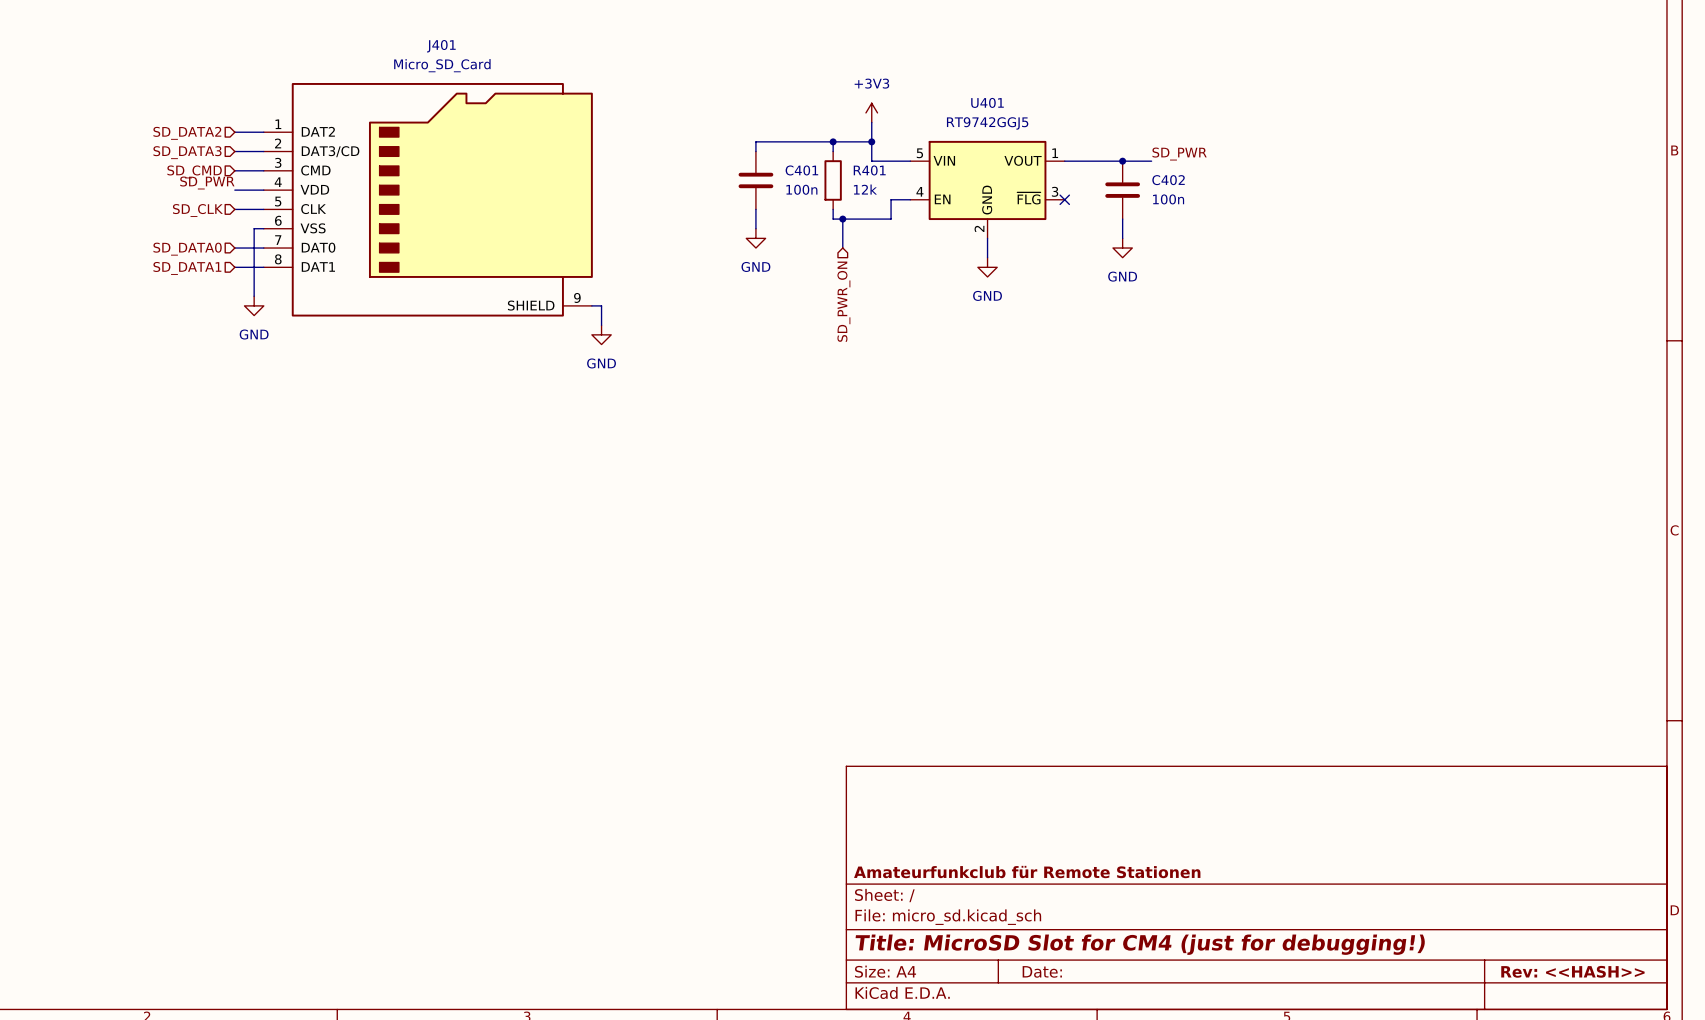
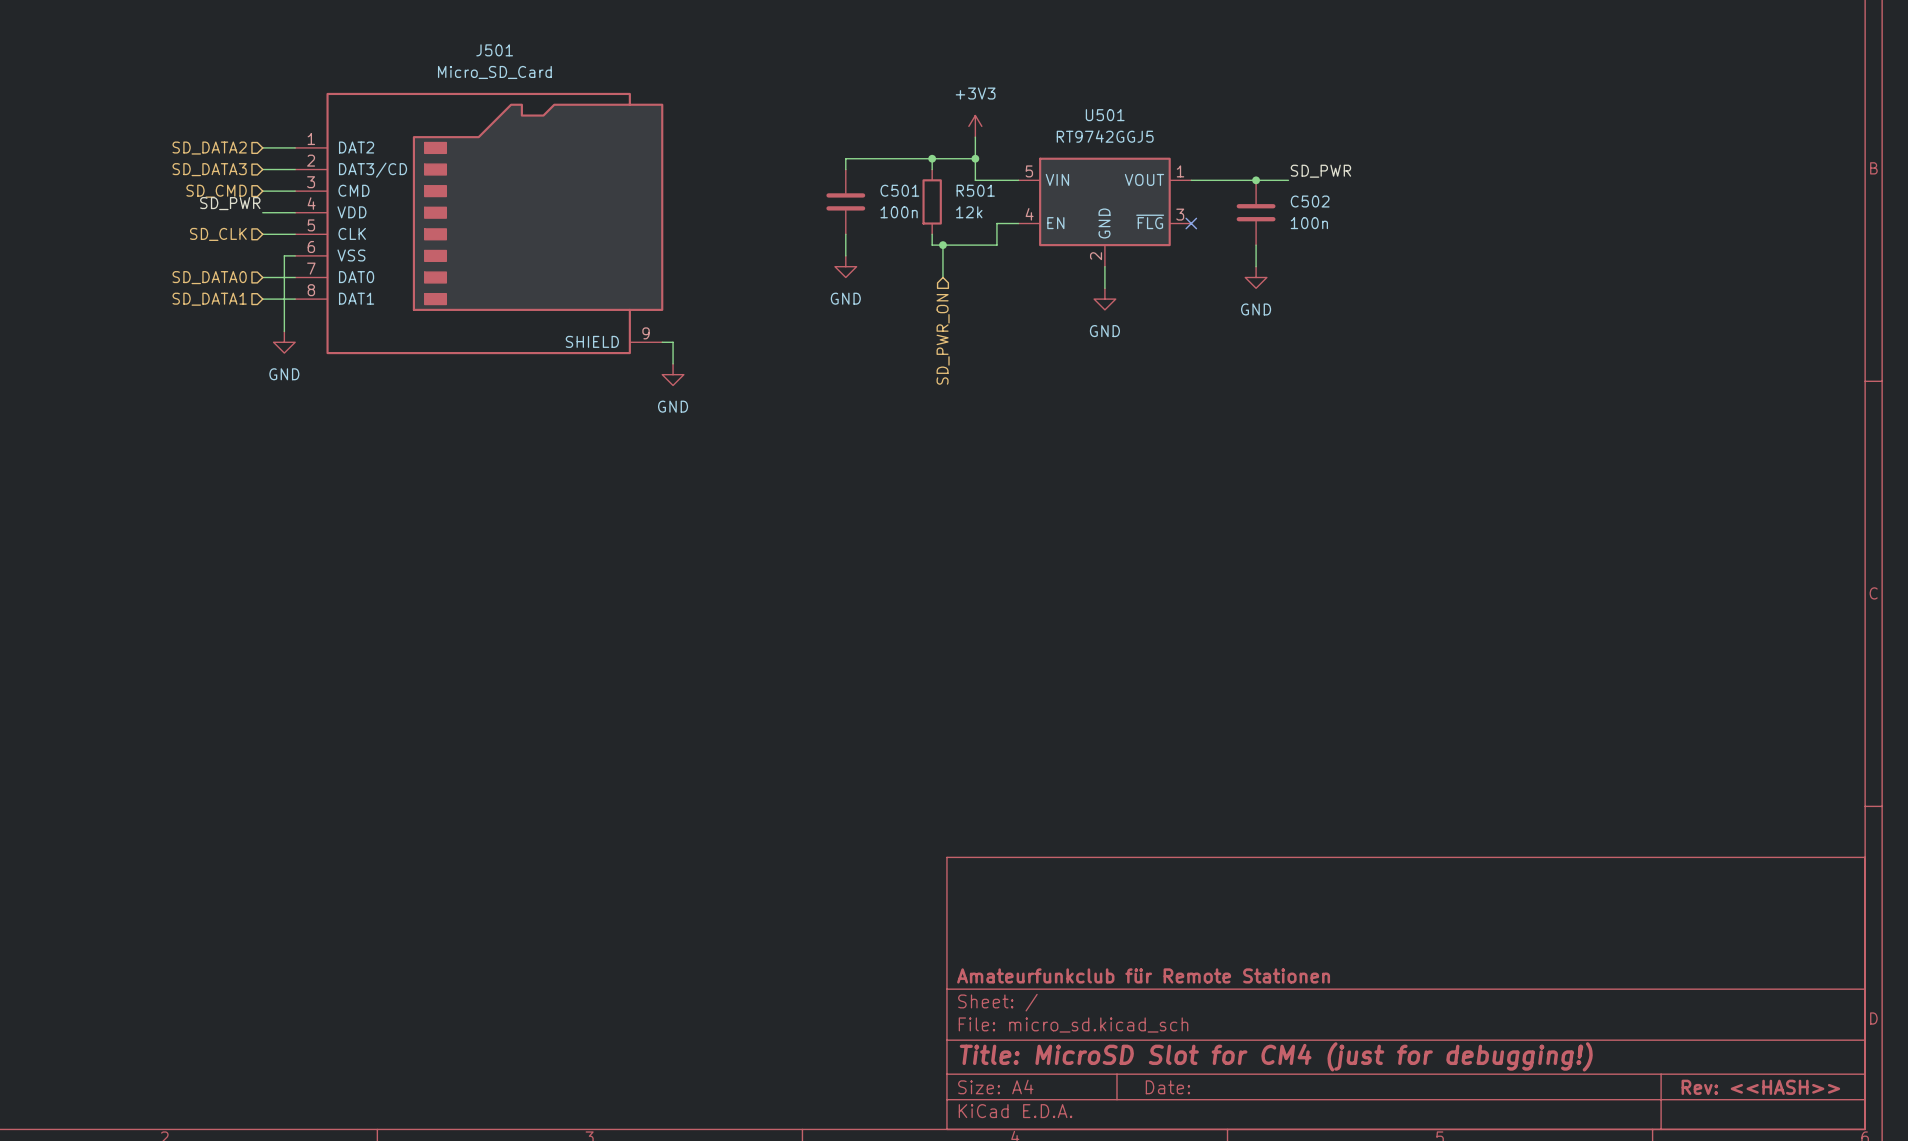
J401 name: J401 (441, 46) -> J501 (494, 50)
U401 name: U401 (987, 102) -> U501 (1105, 115)
C401 name: C401 (801, 170) -> C501 (899, 190)
R401 name: R401 (869, 170) -> R501 (975, 190)
C402 name: C402 (1168, 180) -> C502 (1310, 201)

